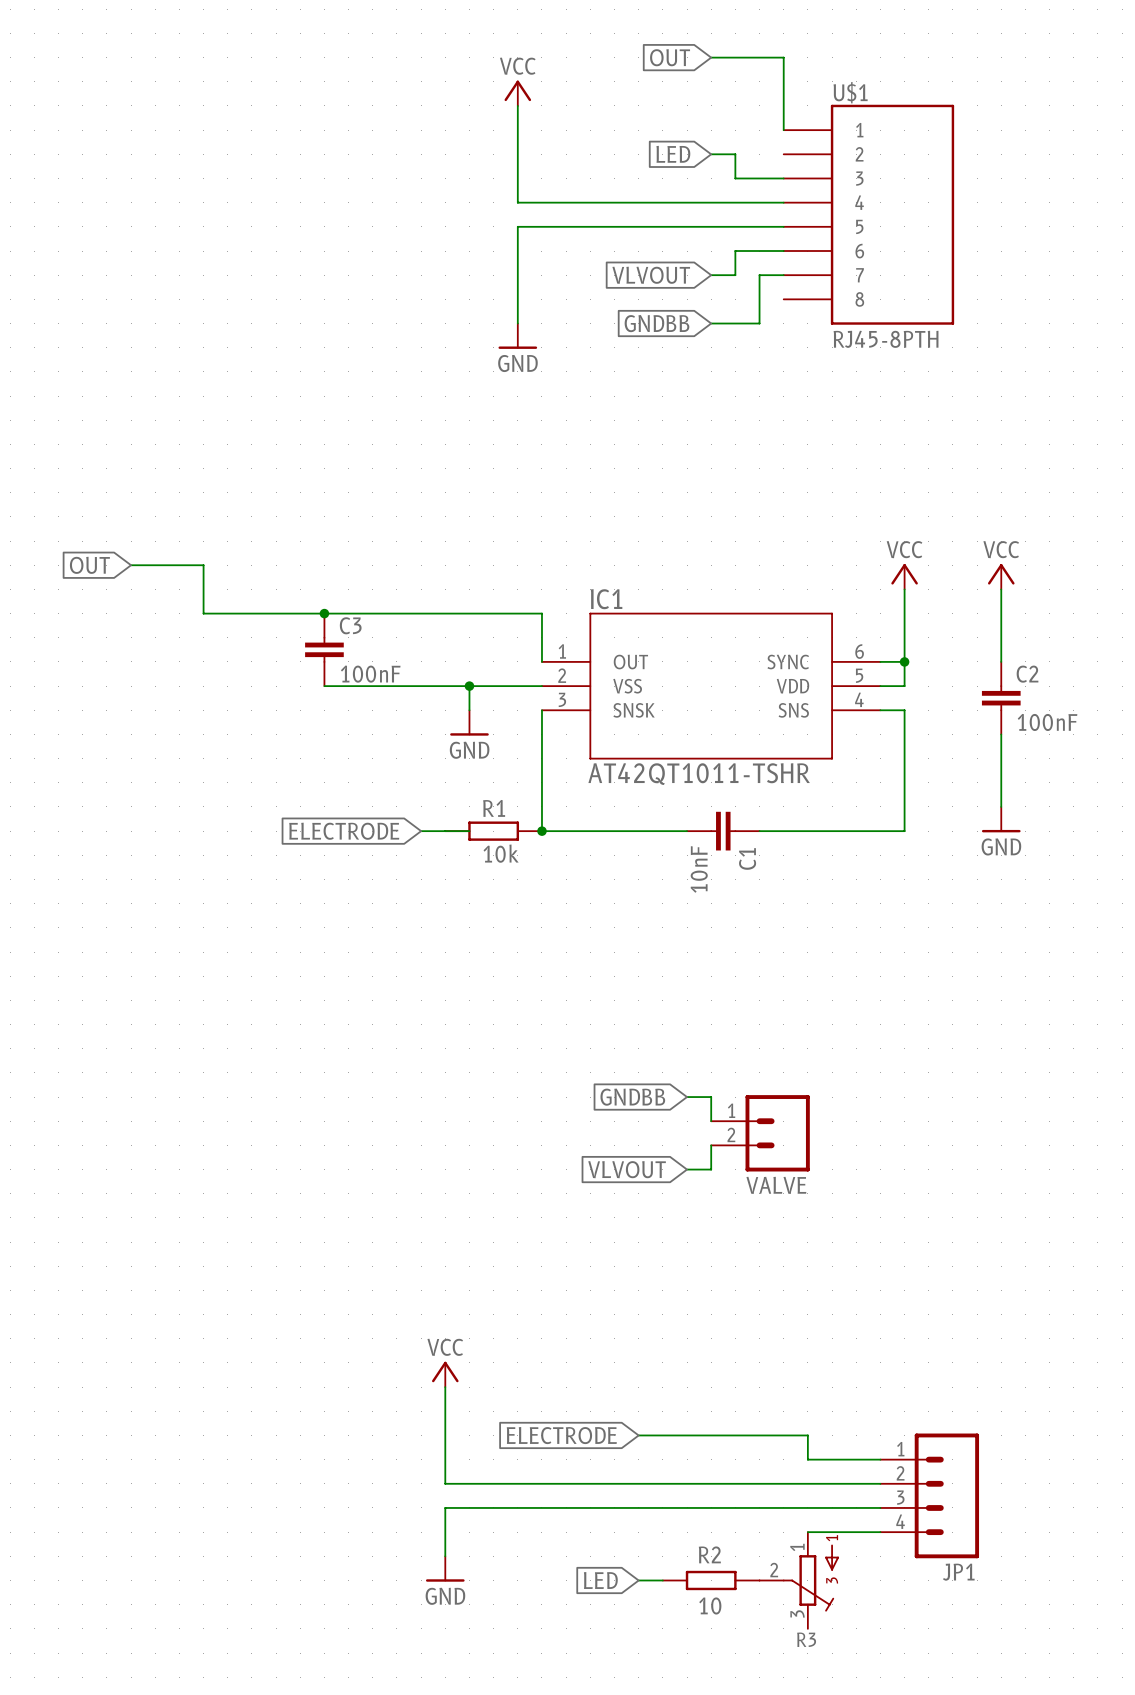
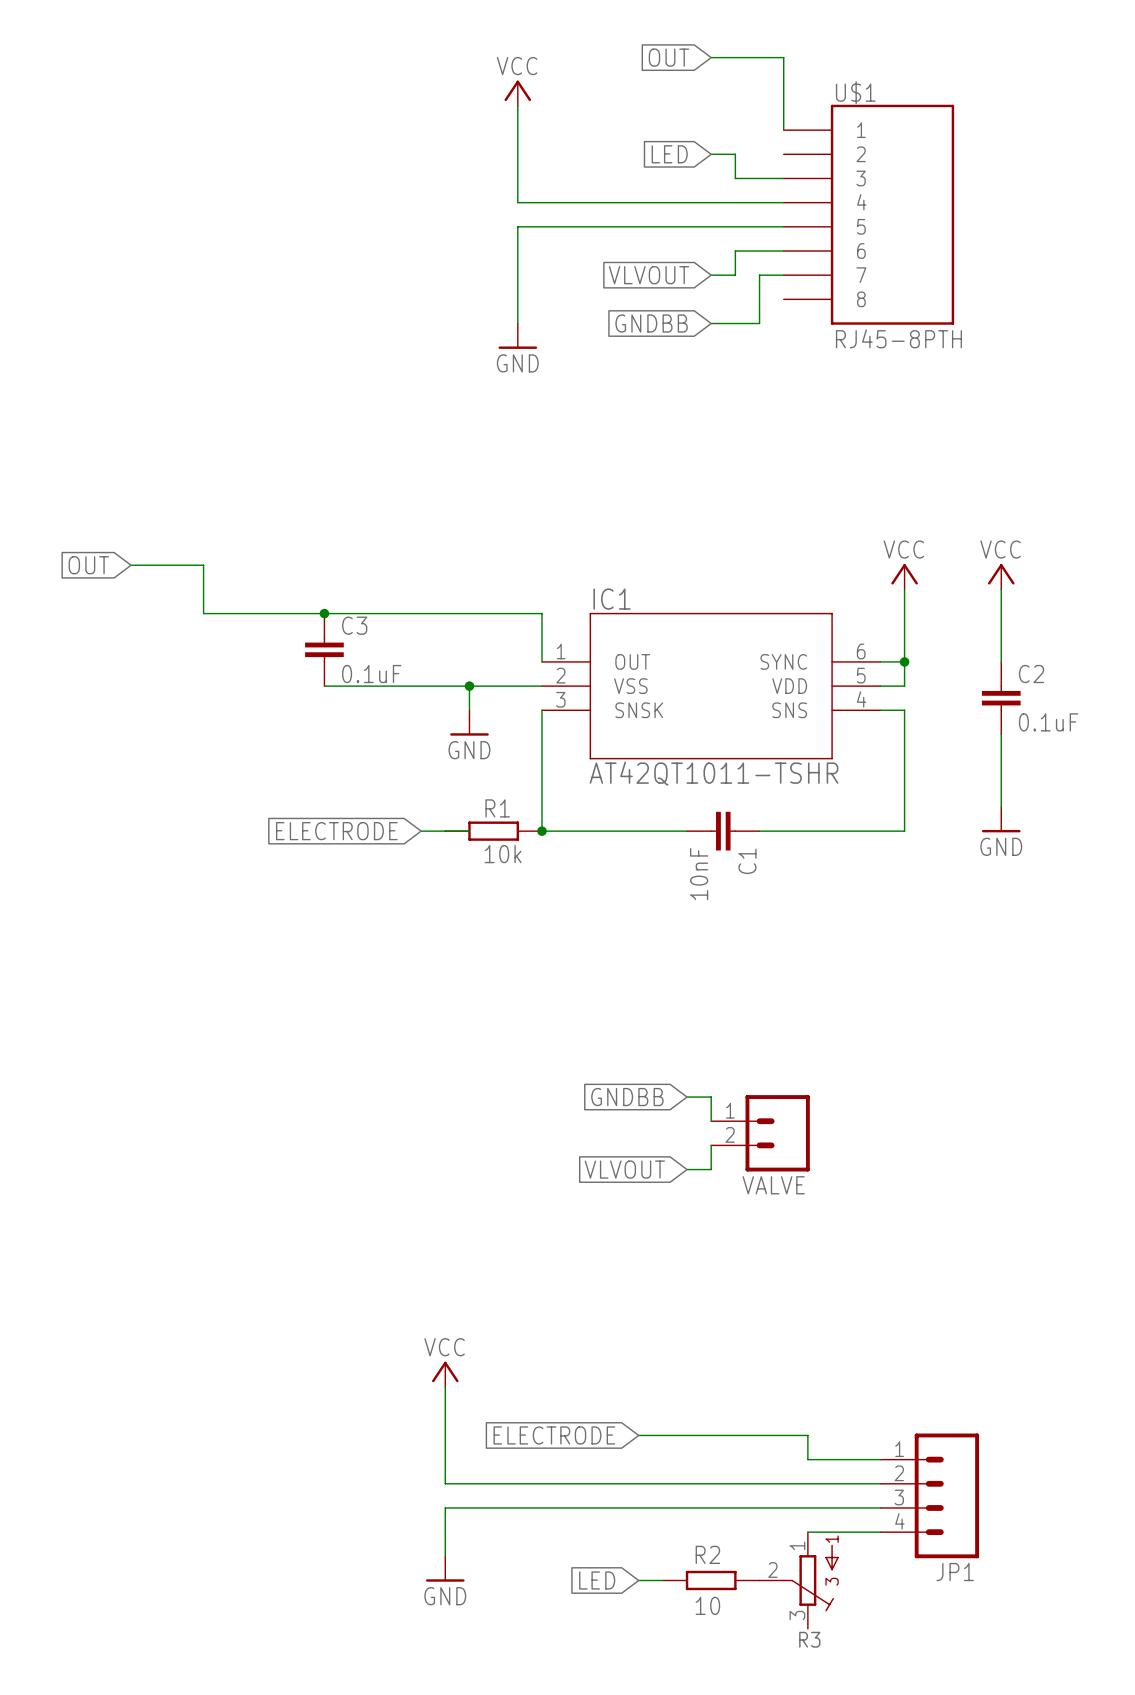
C3 value: 100nF (370, 674) -> 0.1uF (371, 674)
C2 value: 100nF (1047, 722) -> 0.1uF (1048, 722)

